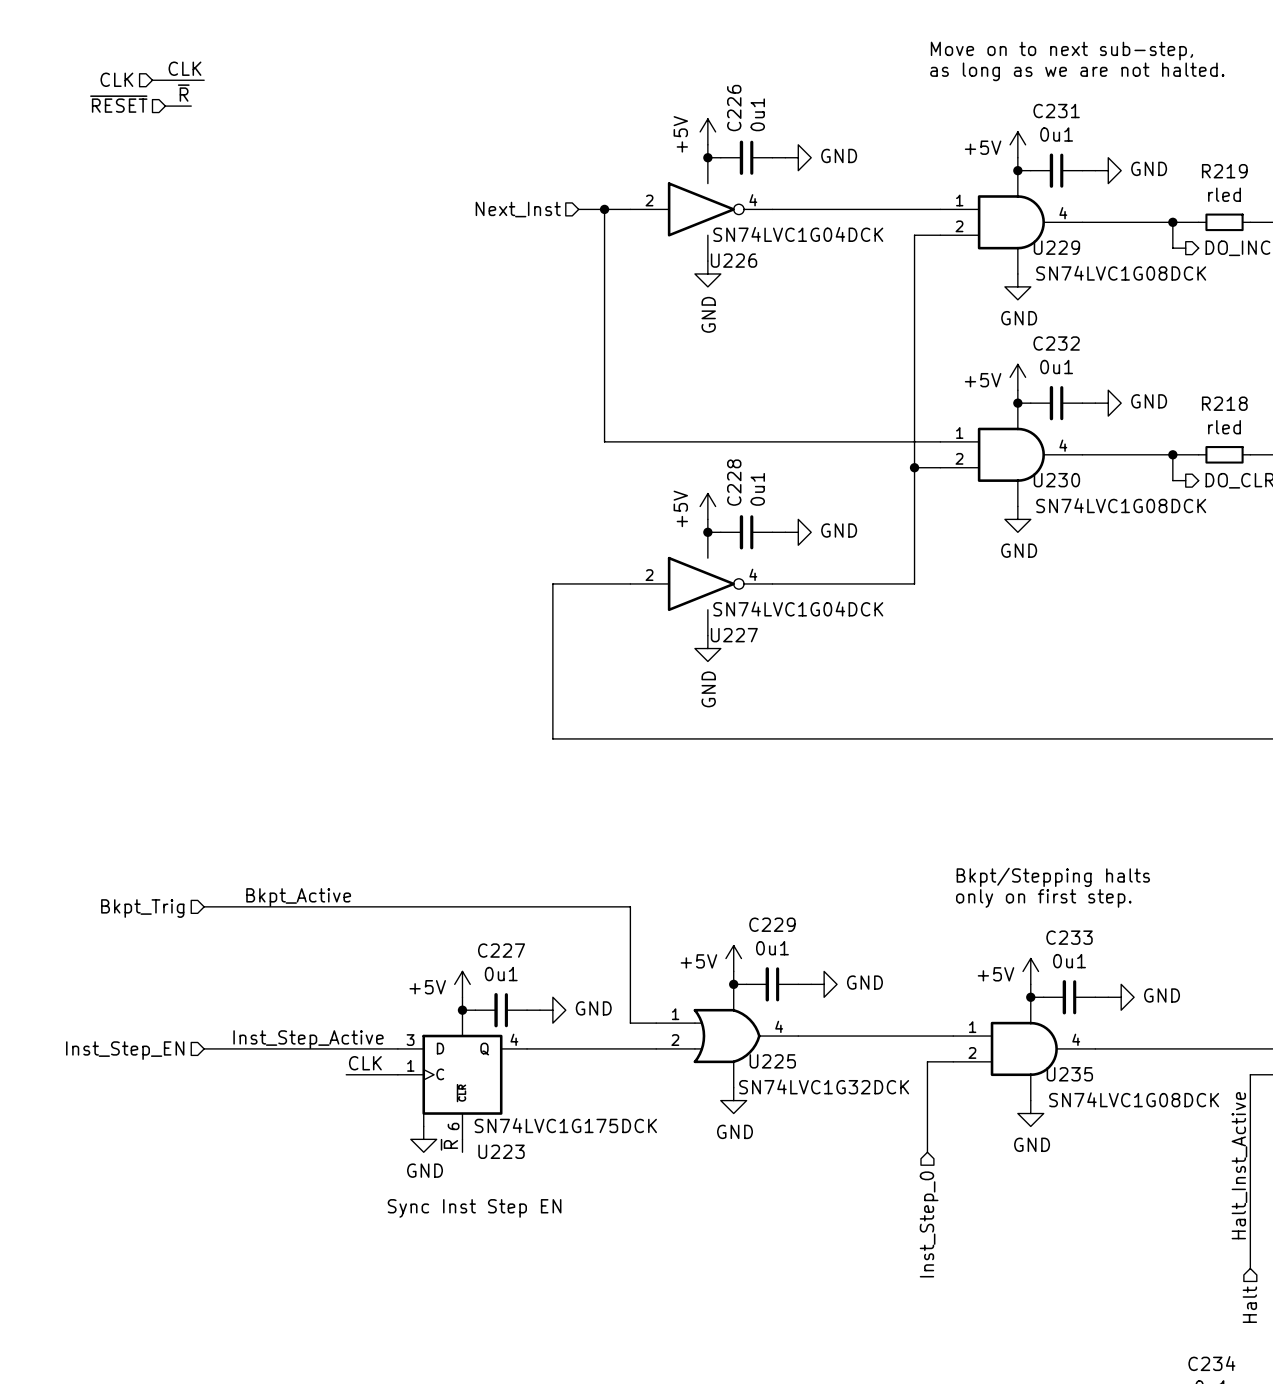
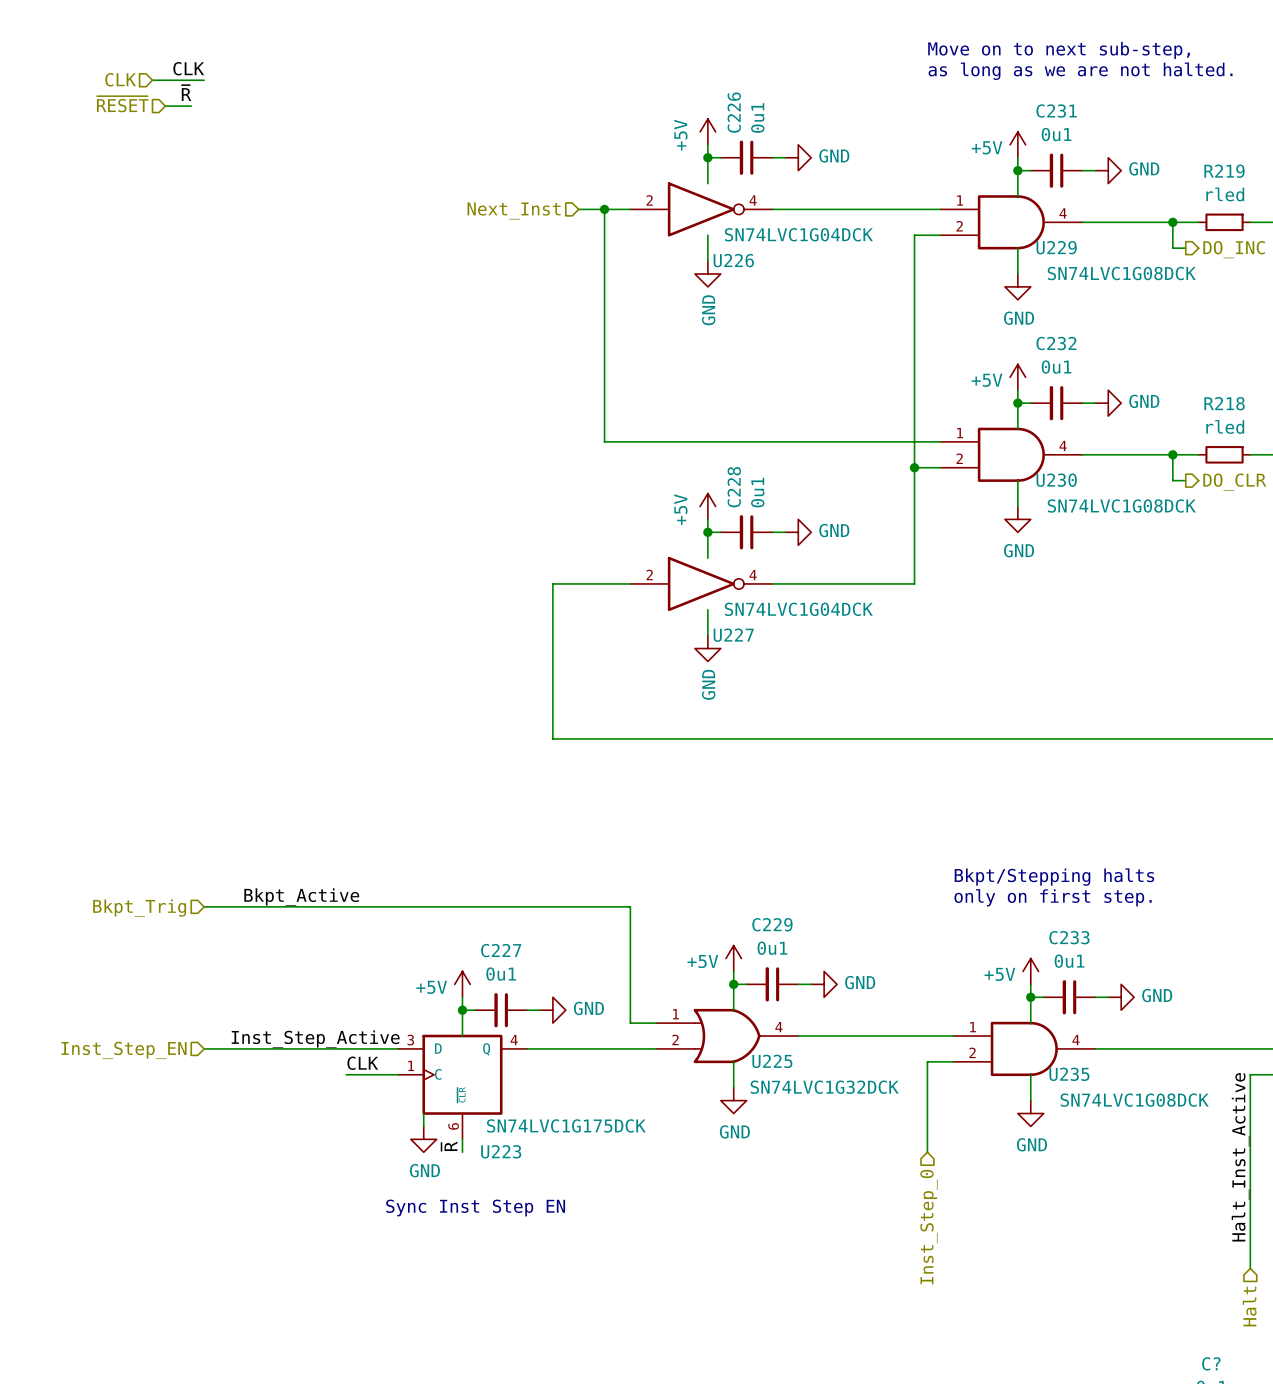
C234 name: C234 (1211, 1363) -> C? (1211, 1363)

